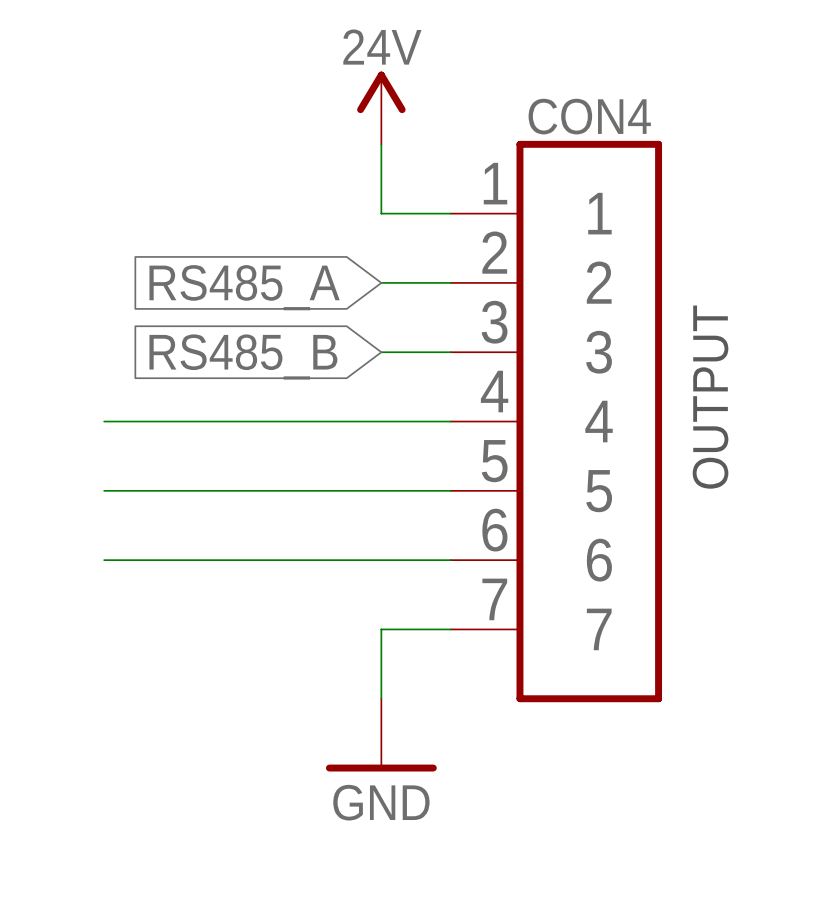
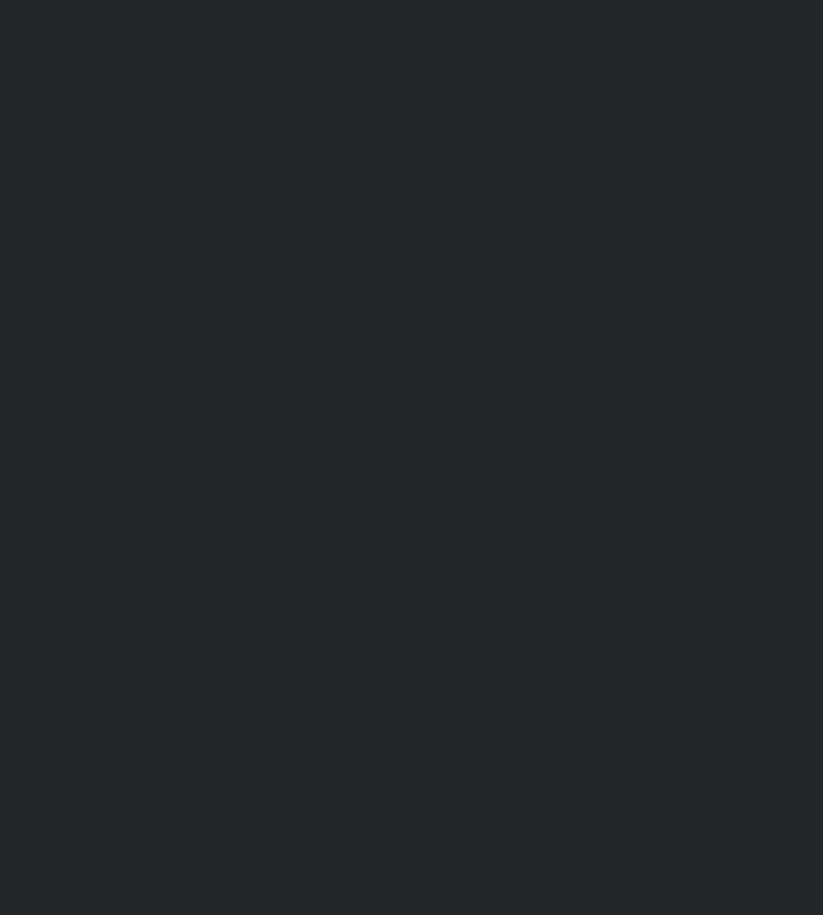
power symbol: 24V (381, 107) -> none
wire: (381, 144) (381, 213) (450, 213) -> none
wire: (381, 282) (450, 282) -> none
global label: RS485_A (244, 287) -> none
wire: (381, 352) (450, 352) -> none
global label: RS485_B (243, 356) -> none
text: OUTPUT (710, 397) -> none
wire: (104, 421) (450, 421) -> none
CON4: (556, 421) -> none
wire: (104, 490) (450, 490) -> none
wire: (104, 560) (450, 560) -> none
wire: (450, 629) (381, 629) (381, 698) -> none
power symbol: GND (381, 735) -> none

